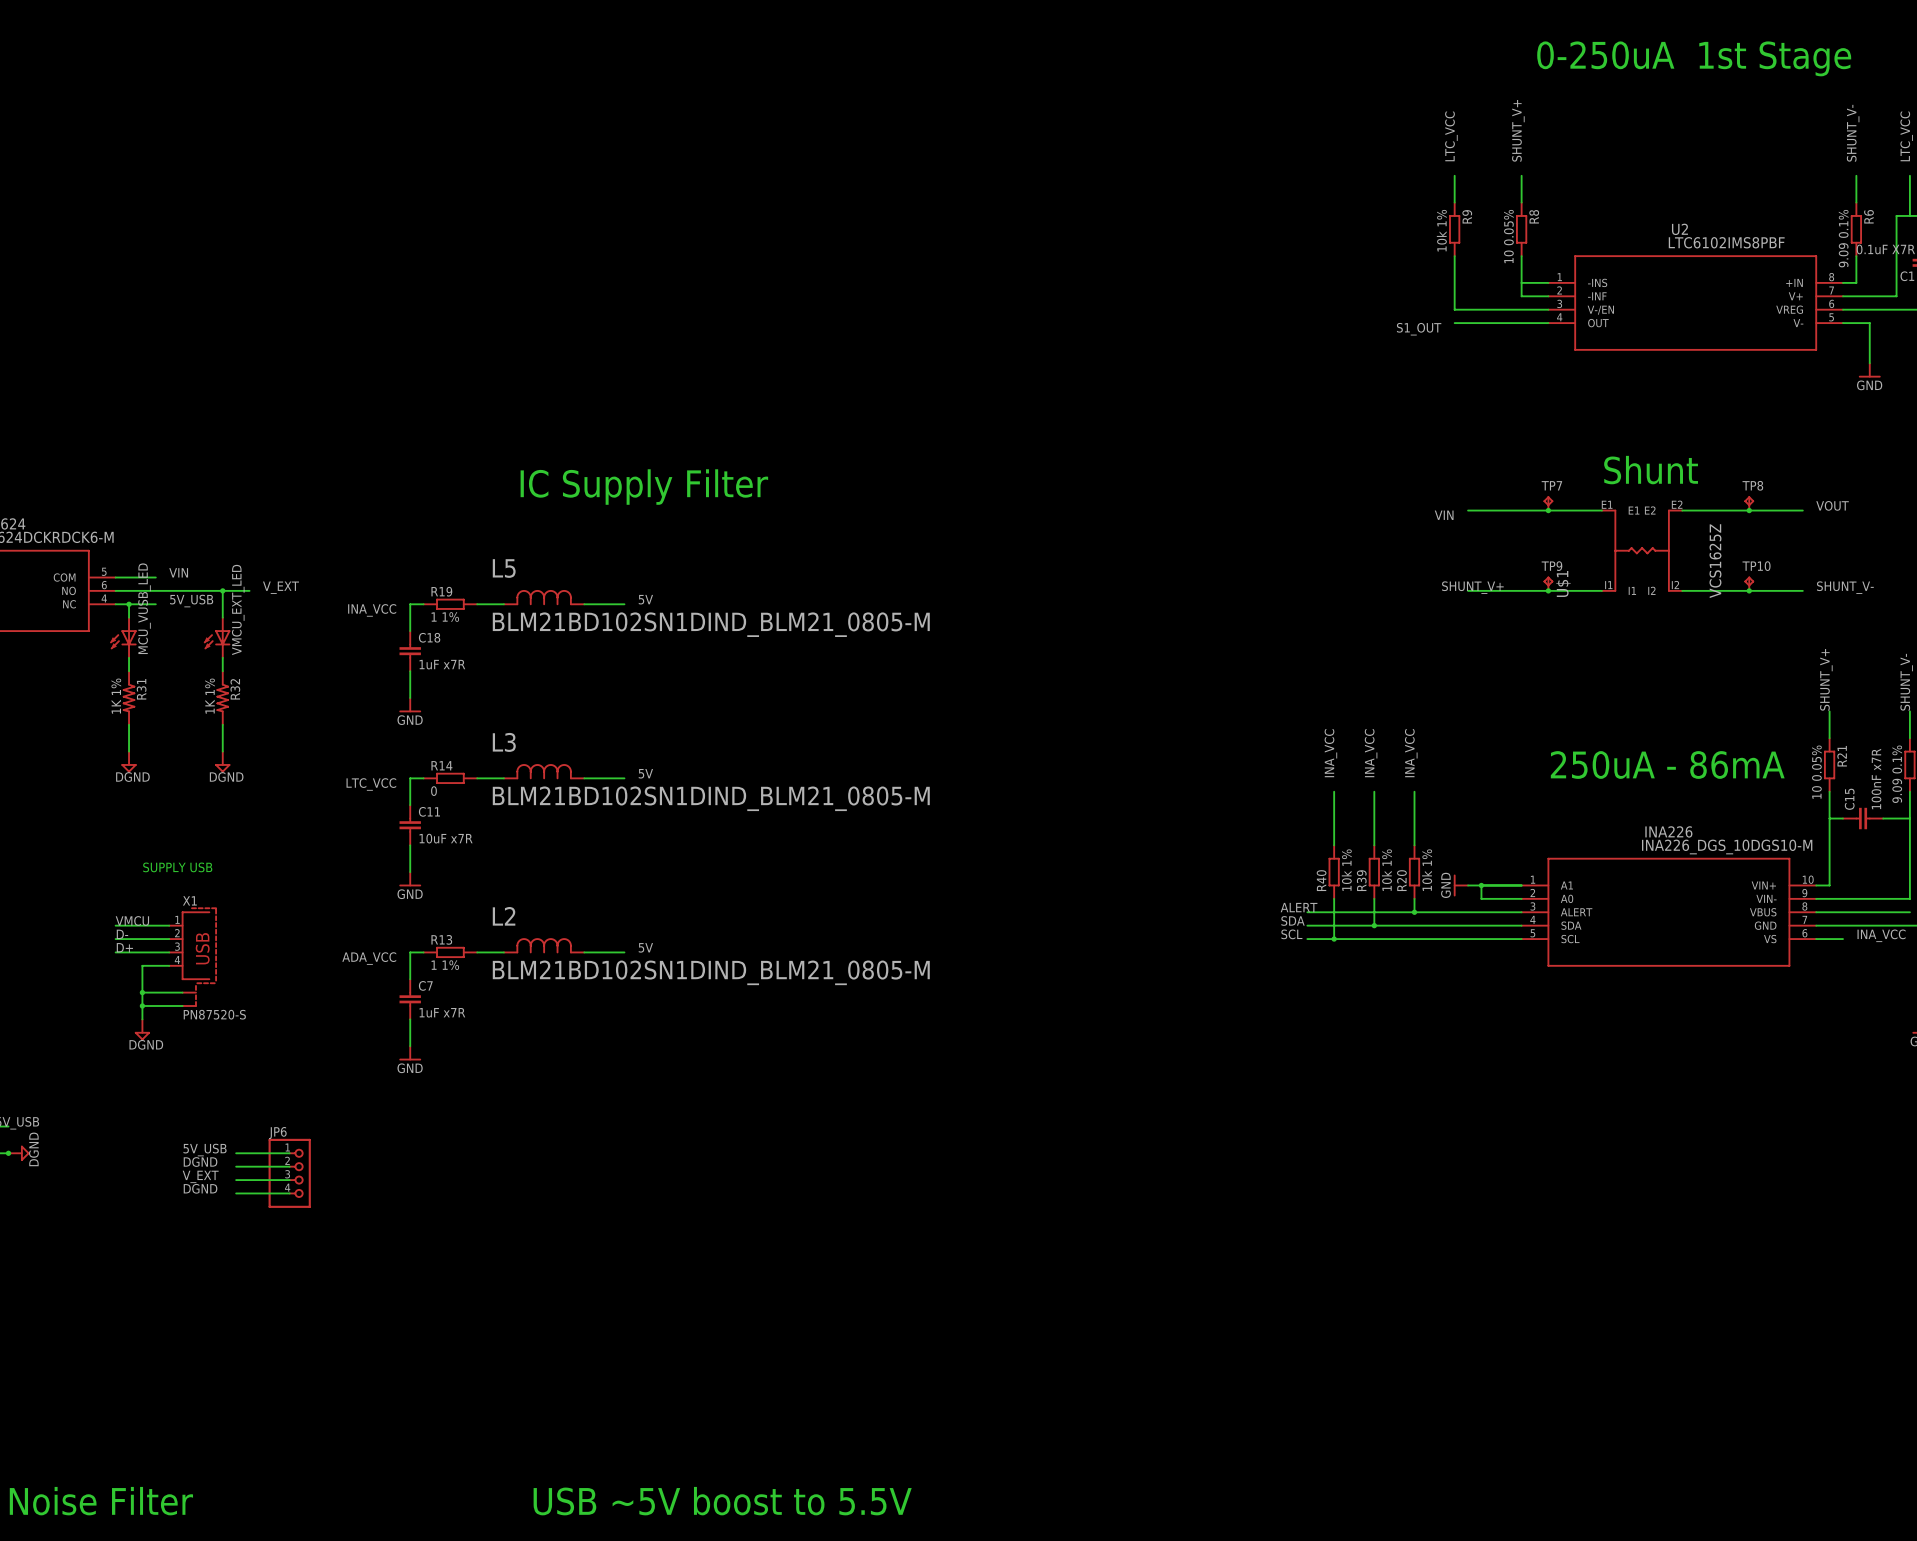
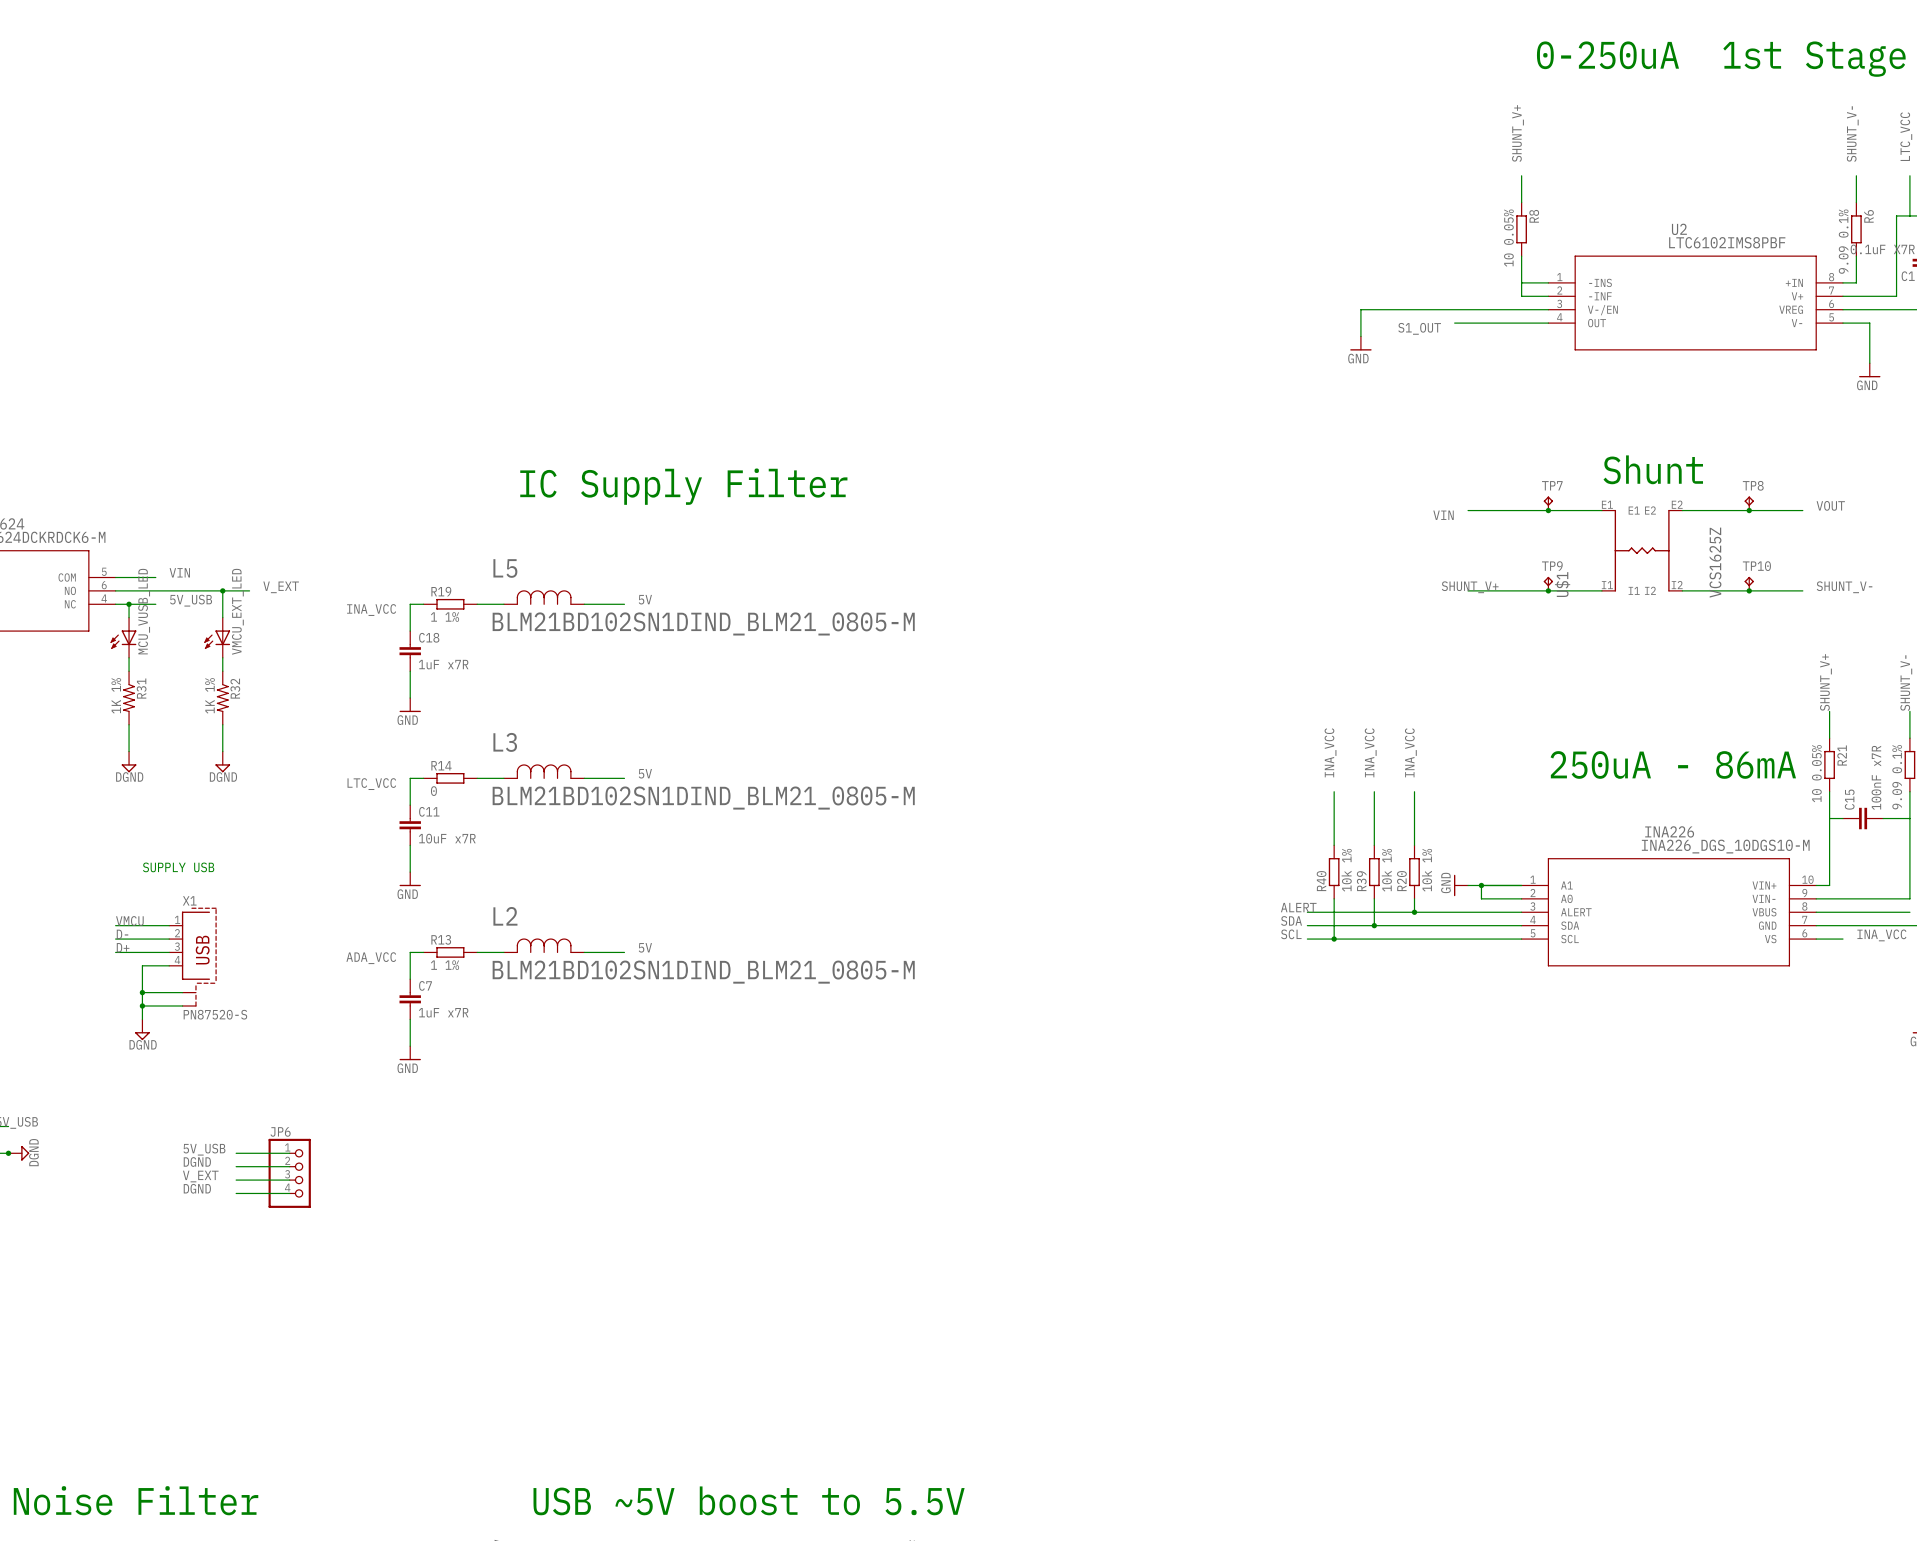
label: LTC_VCC (1451, 136) -> none
wire: (1454, 175) (1454, 202) -> none
R9: 10k 1% (1454, 229) -> none
wire: (1454, 256) (1454, 309) -> (1360, 336) (1360, 309) (1454, 309)
power symbol: none -> GND (1360, 343)

